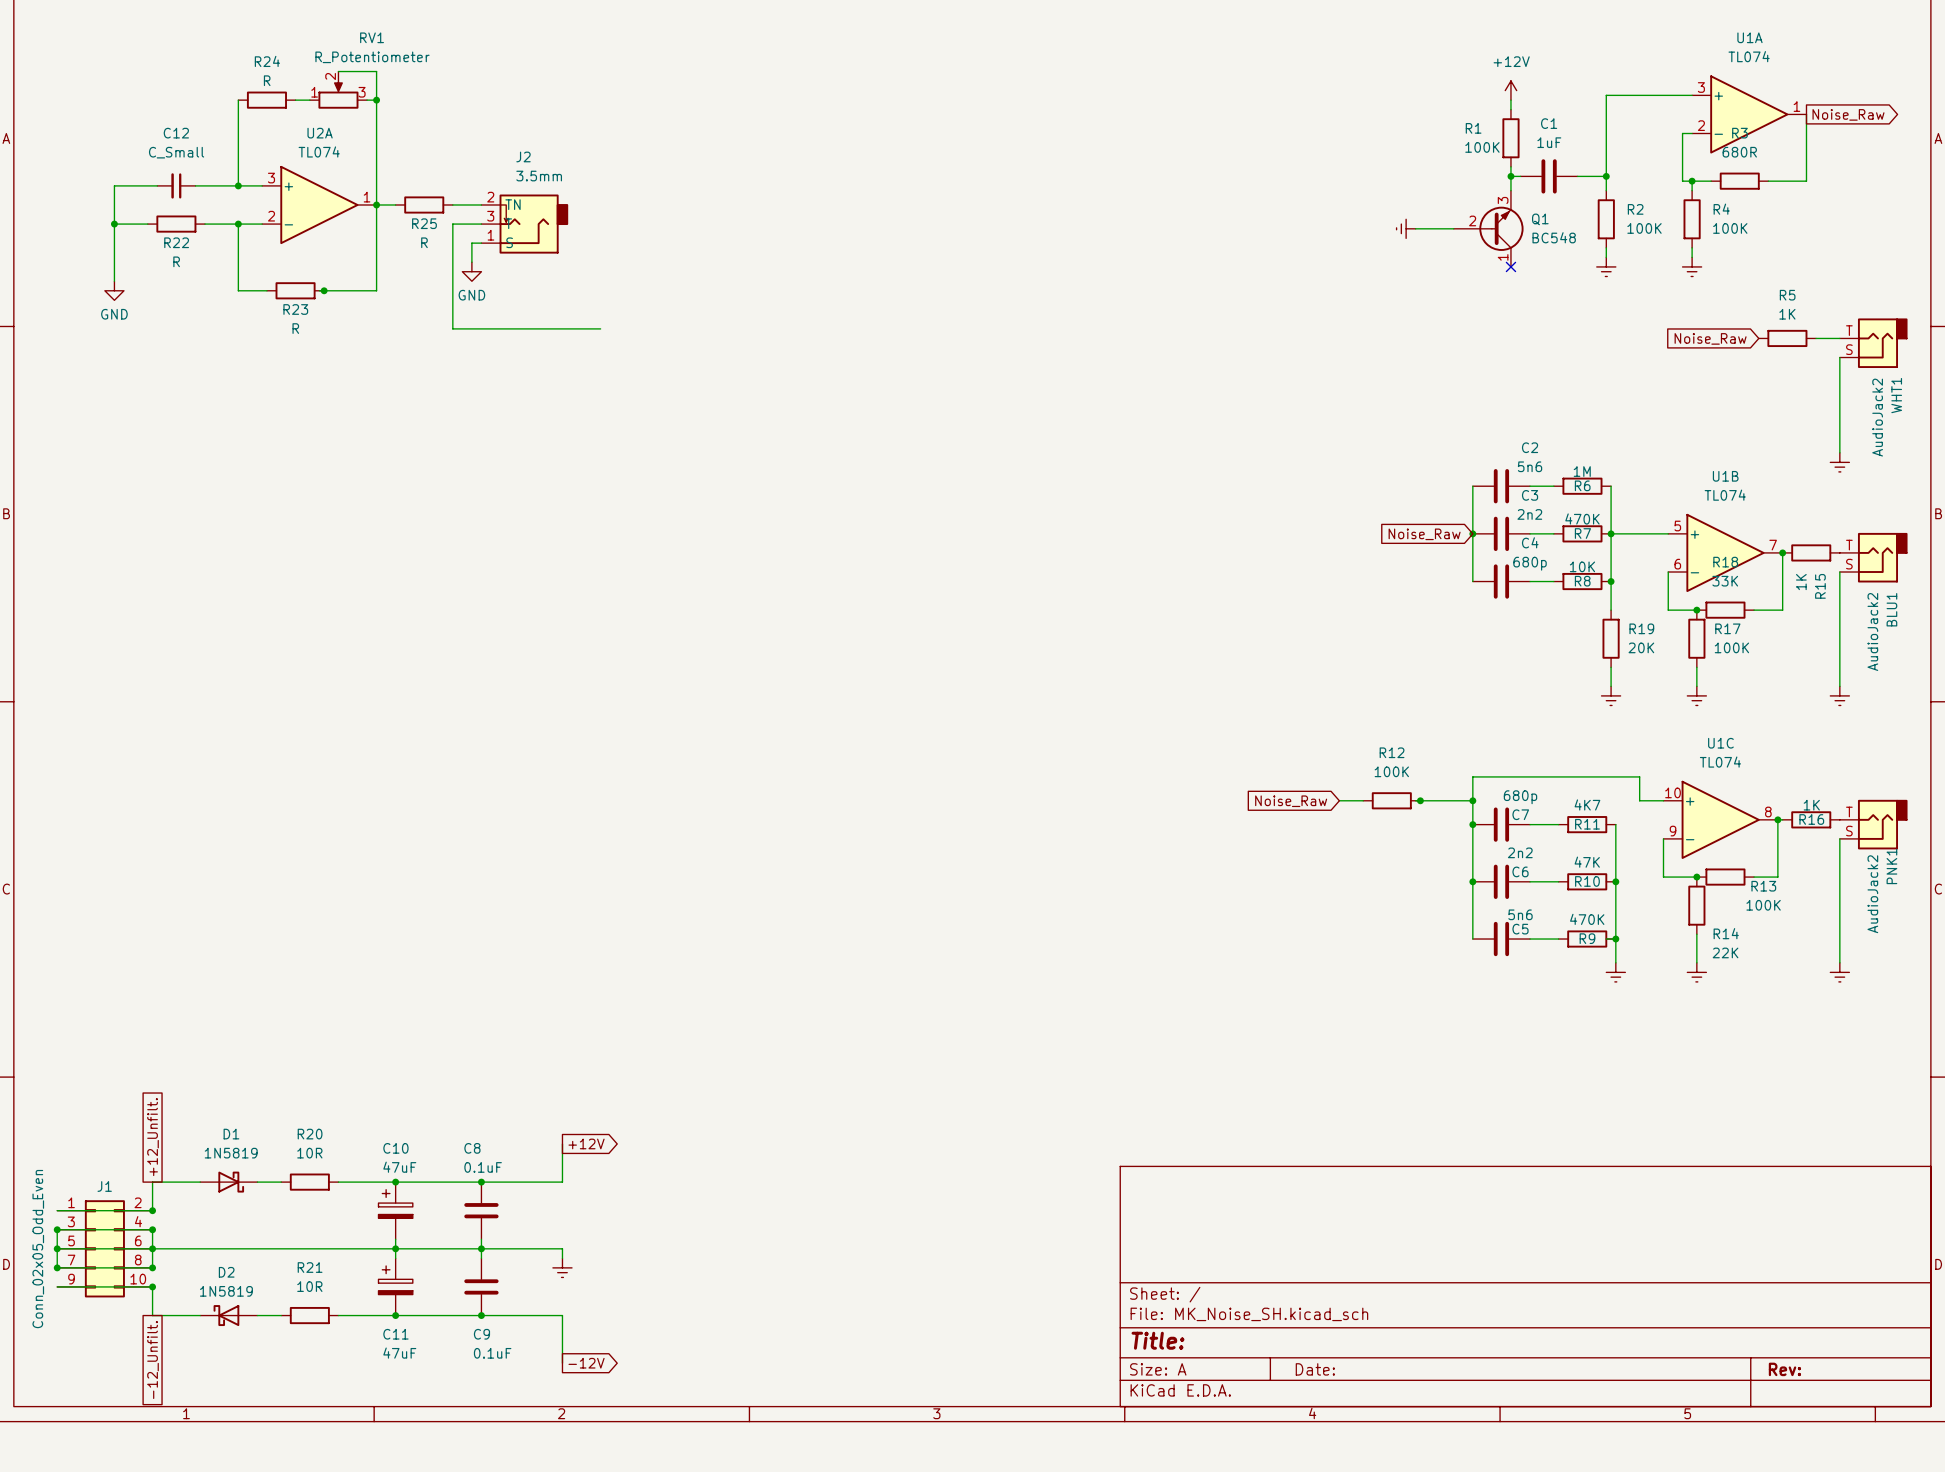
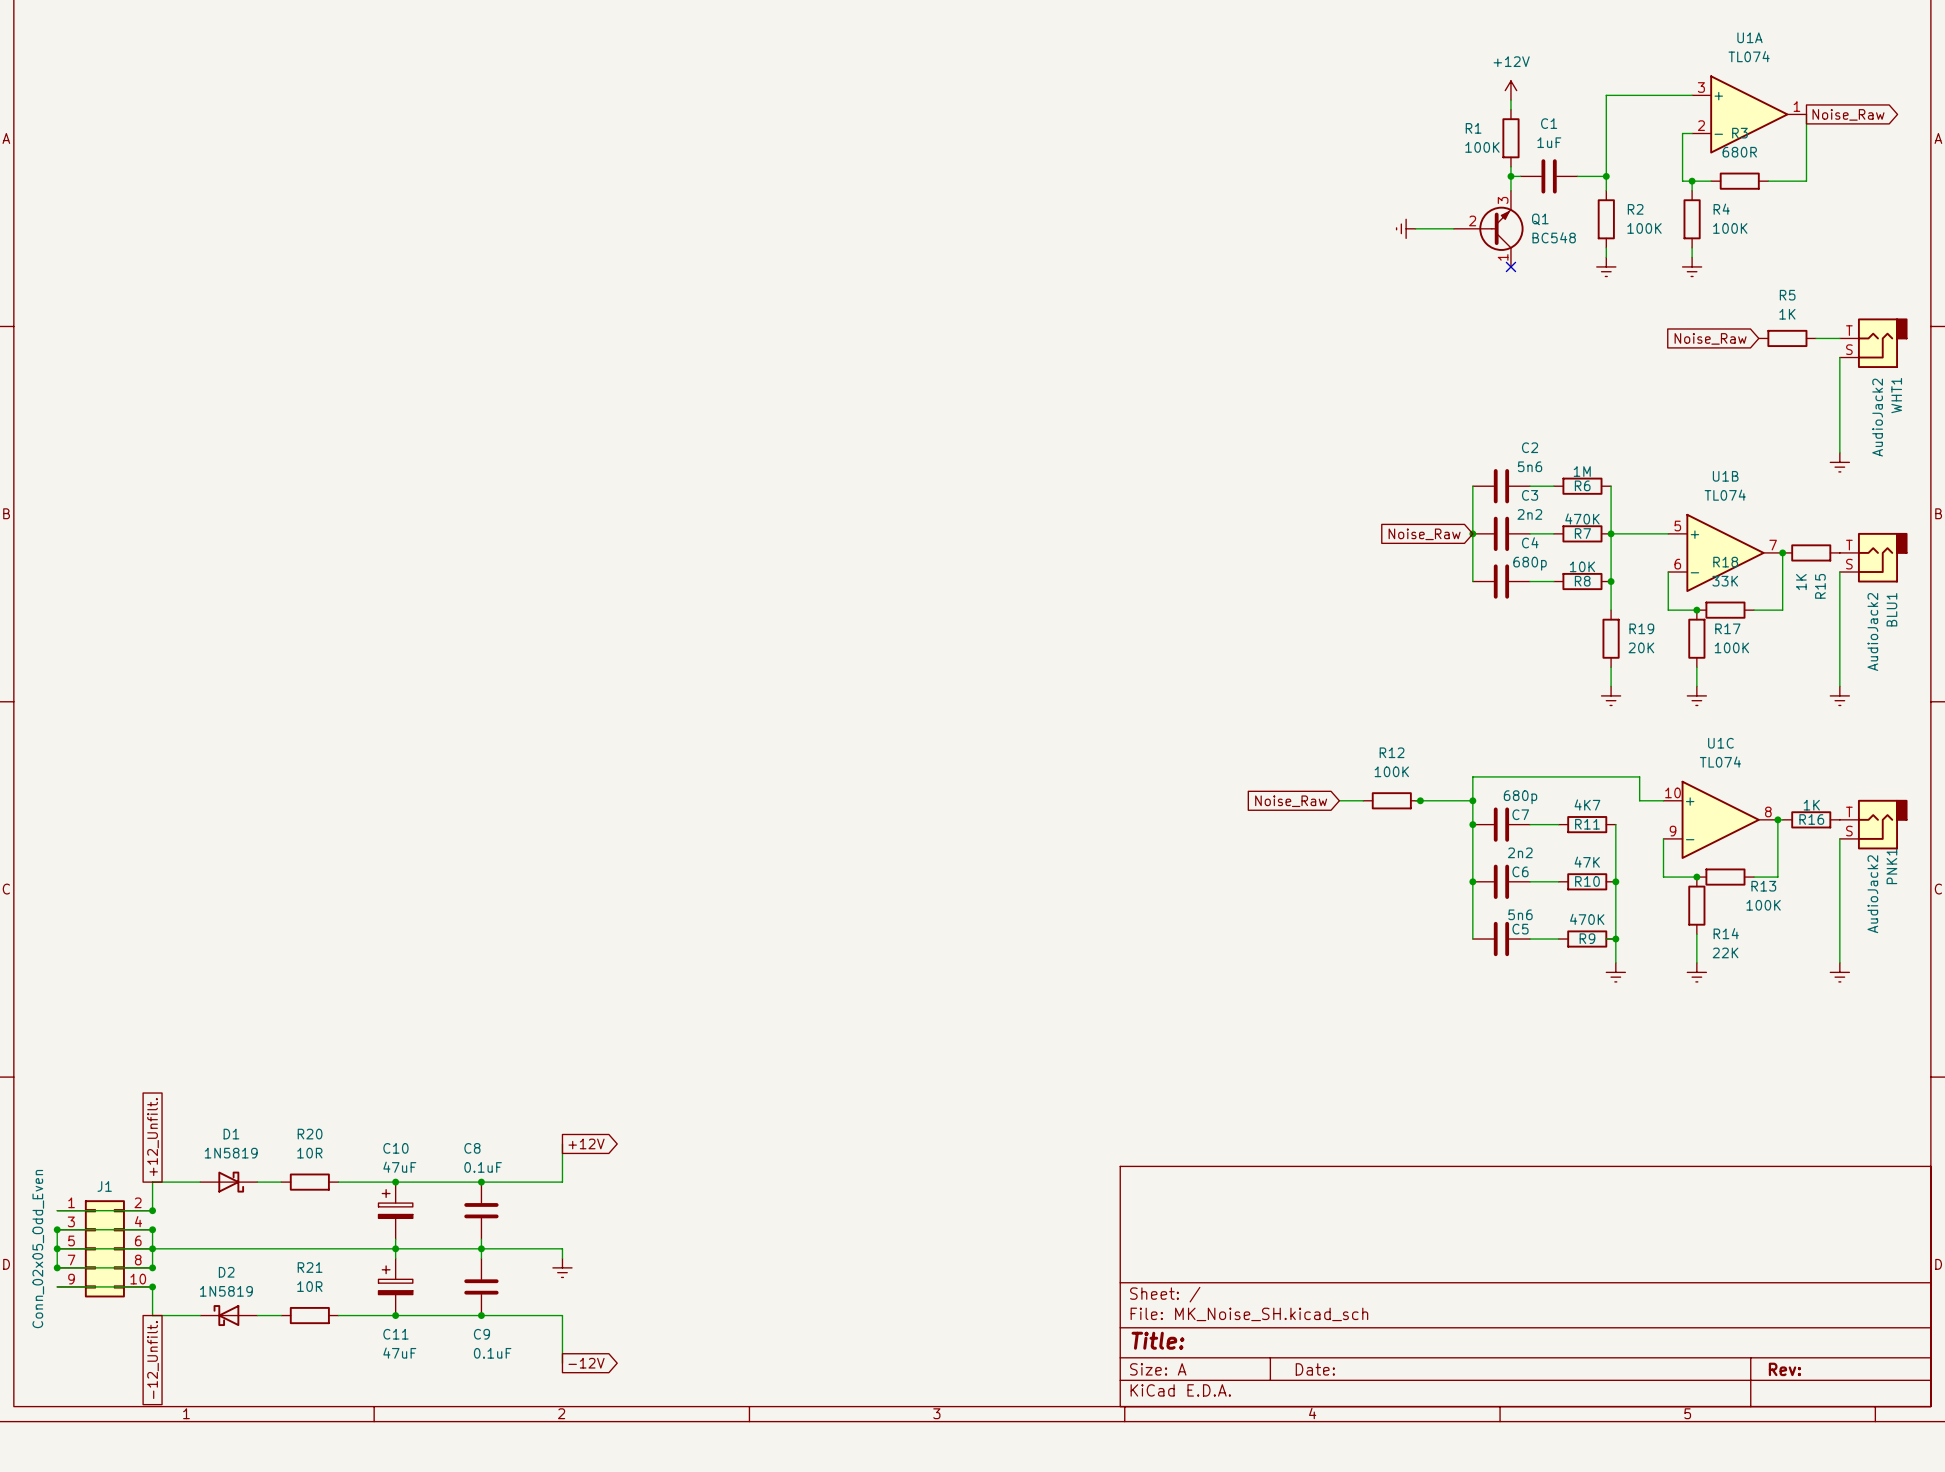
wire: (338, 71) (376, 71) (376, 290) (319, 290) -> none
RV1: R_Potentiometer (338, 90) -> none
wire: (238, 100) (238, 185) -> none
R24: R (266, 100) -> none
wire: (295, 100) (309, 100) -> none
wire: (367, 100) (376, 100) -> none
junction: (376, 100) -> none
wire: (157, 185) (114, 185) (114, 281) -> none
C12: C_Small (176, 185) -> none
wire: (195, 185) (262, 185) -> none
junction: (238, 185) -> none
U2A: TL074 (319, 204) -> none
wire: (376, 204) (395, 204) -> none
junction: (376, 204) -> none
R25: R (424, 204) -> none
wire: (452, 204) (481, 204) -> none
wire: (114, 224) (147, 224) -> none
junction: (114, 224) -> none
R22: R (176, 224) -> none
wire: (204, 224) (262, 224) -> none
wire: (238, 224) (238, 290) (266, 290) -> none
junction: (238, 224) -> none
wire: (481, 224) (452, 224) (452, 328) (600, 328) -> none
J2: 3.5mm (524, 224) -> none
wire: (481, 243) (471, 243) (471, 262) -> none
power symbol: GND (471, 271) -> none
power symbol: GND (114, 290) -> none
R23: R (295, 290) -> none
junction: (324, 290) -> none

